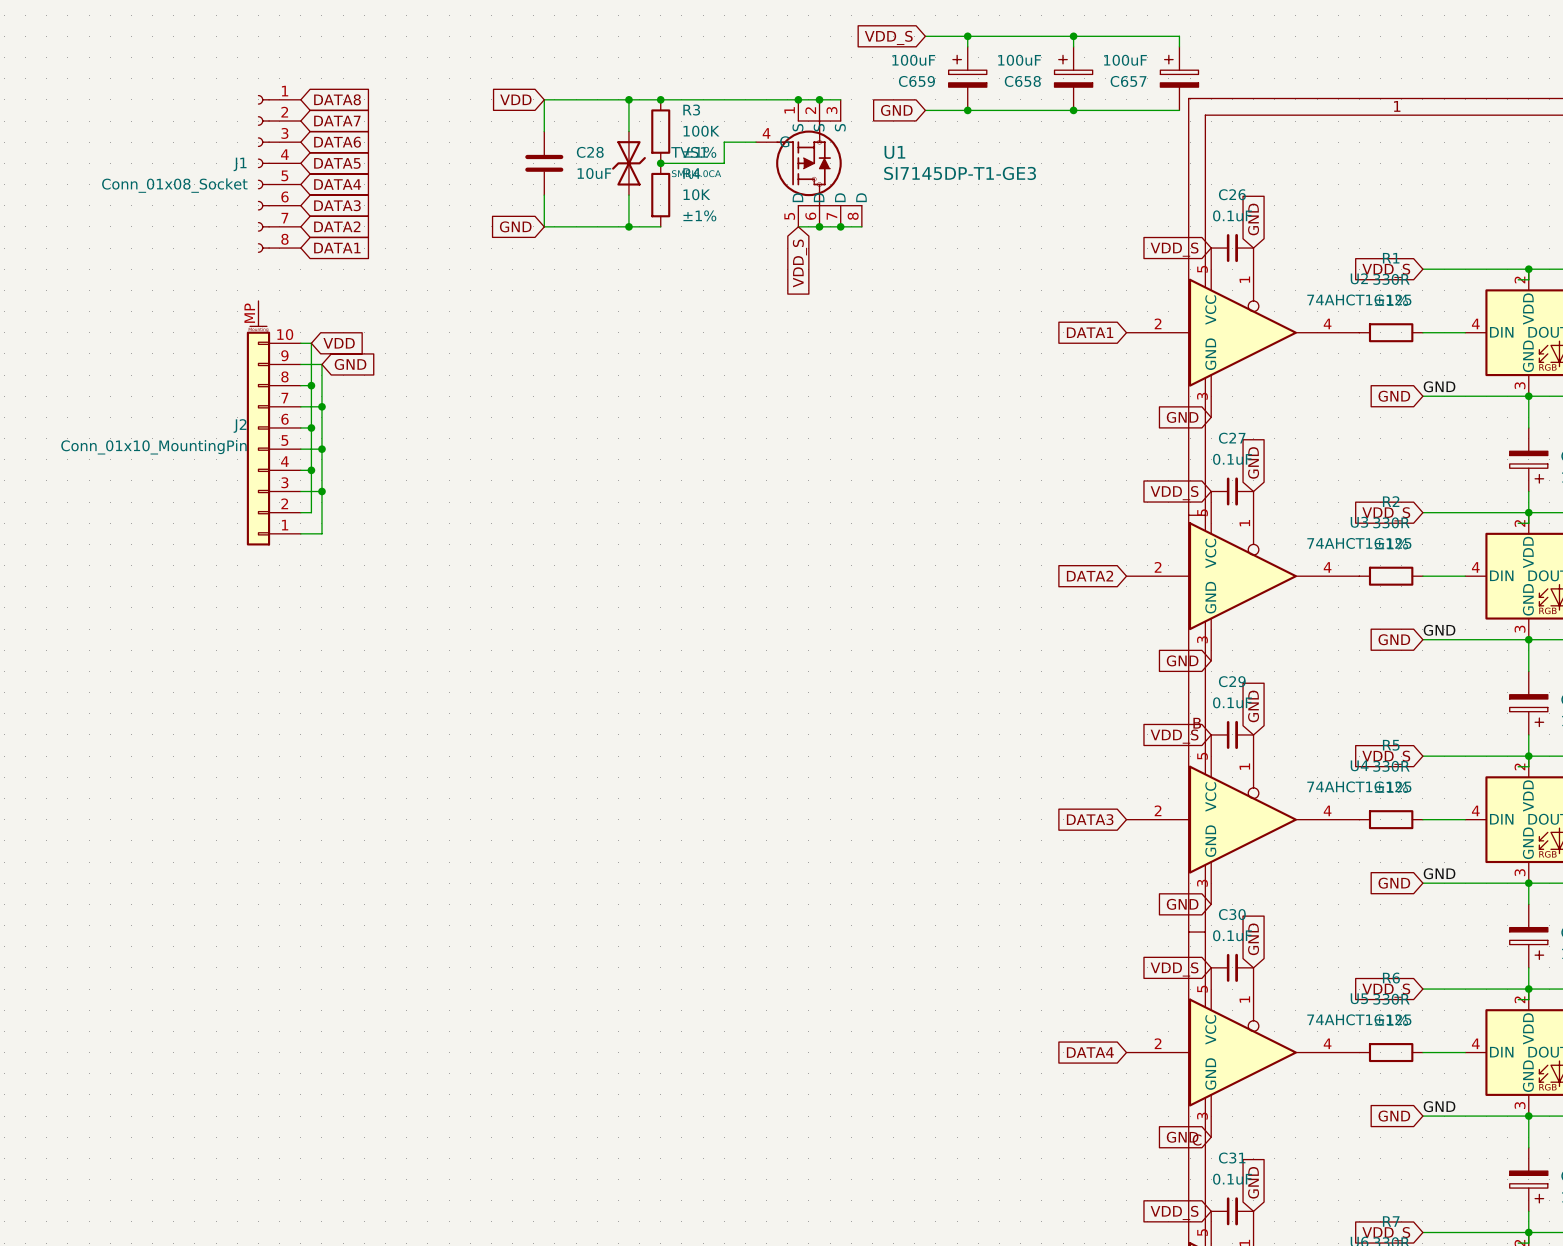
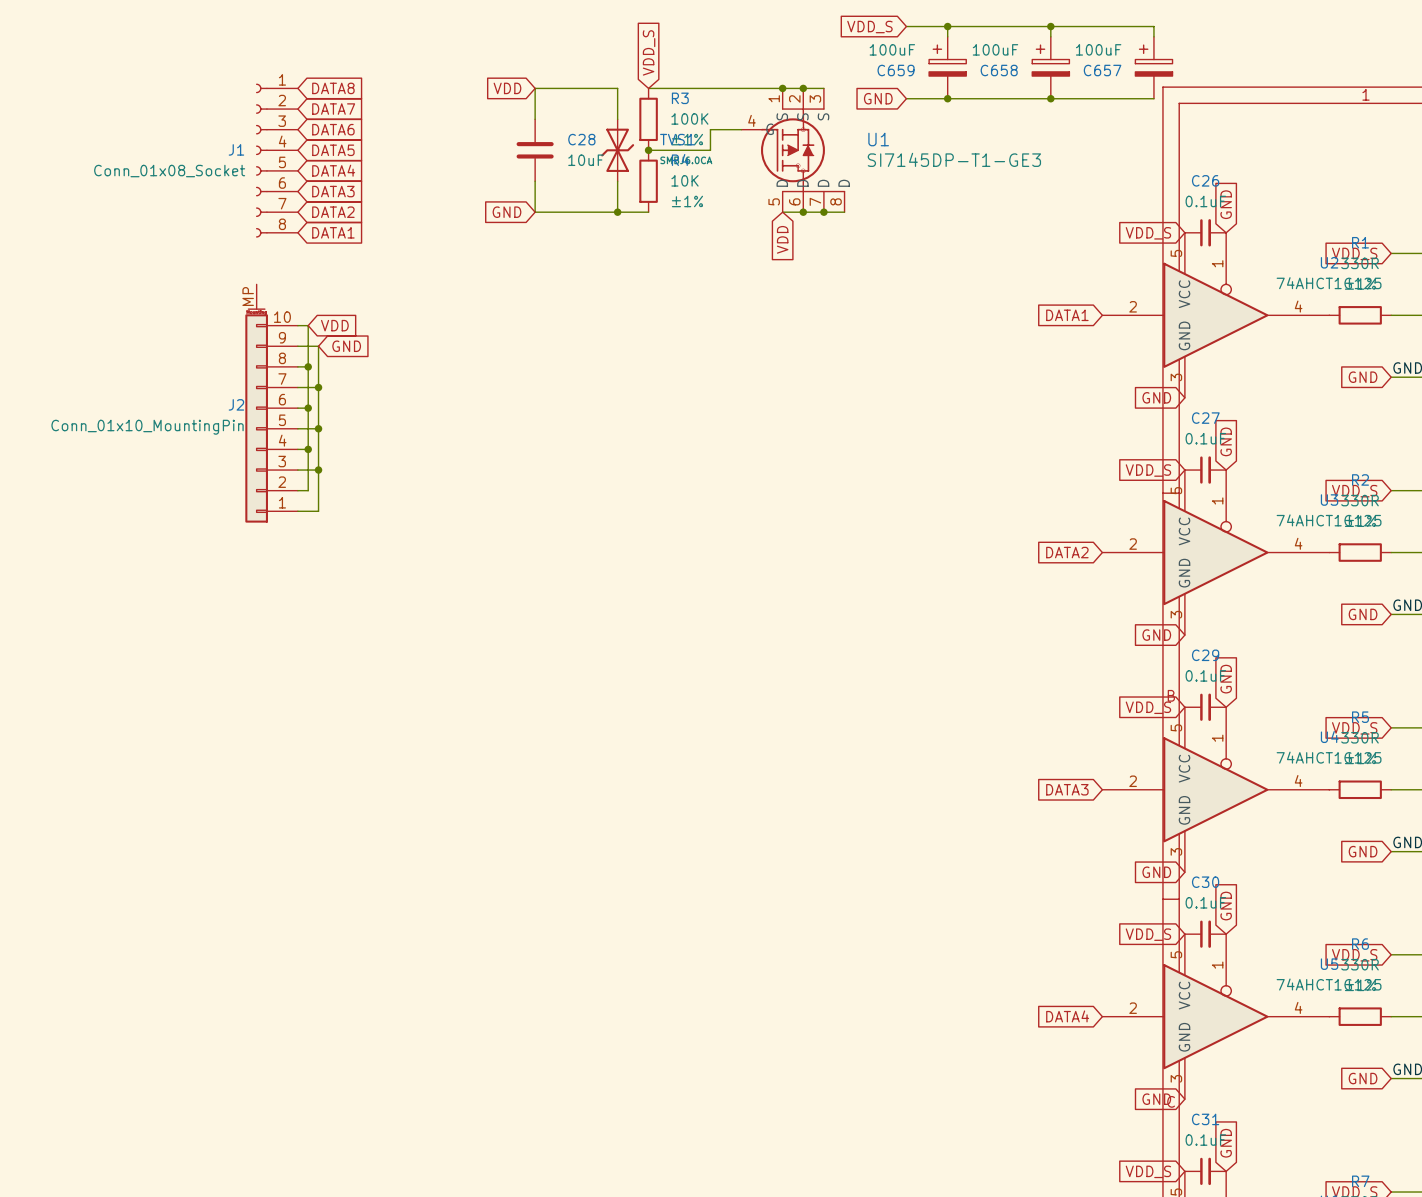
global label: none -> VDD_S (649, 52)
wire: (628, 99) (660, 99) -> none
junction: (628, 99) -> none
junction: (660, 99) -> none
global label: VDD_S (799, 263) -> VDD (782, 239)

